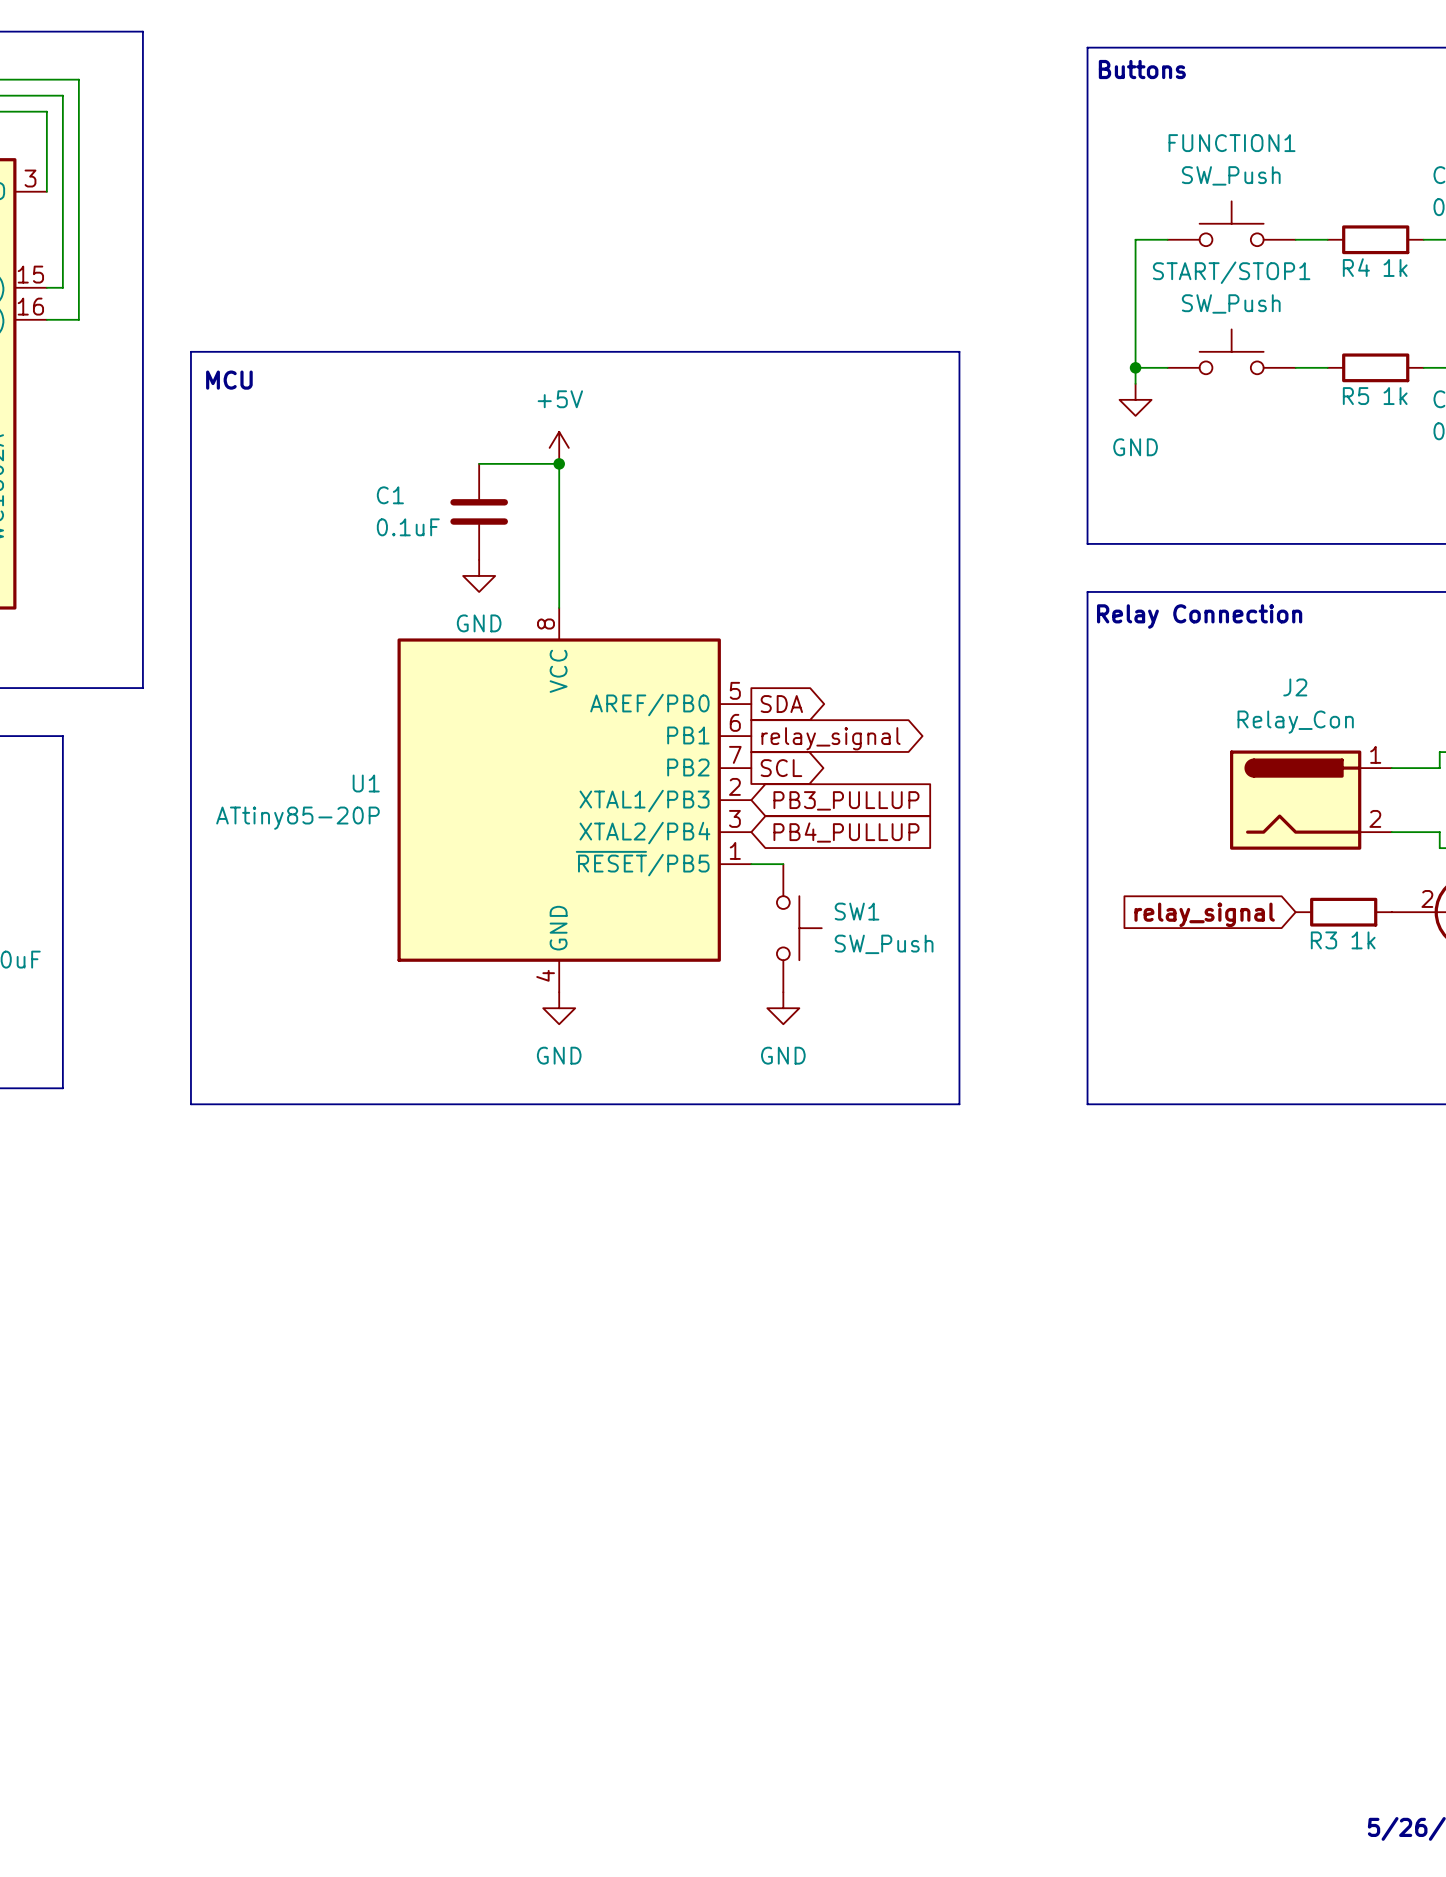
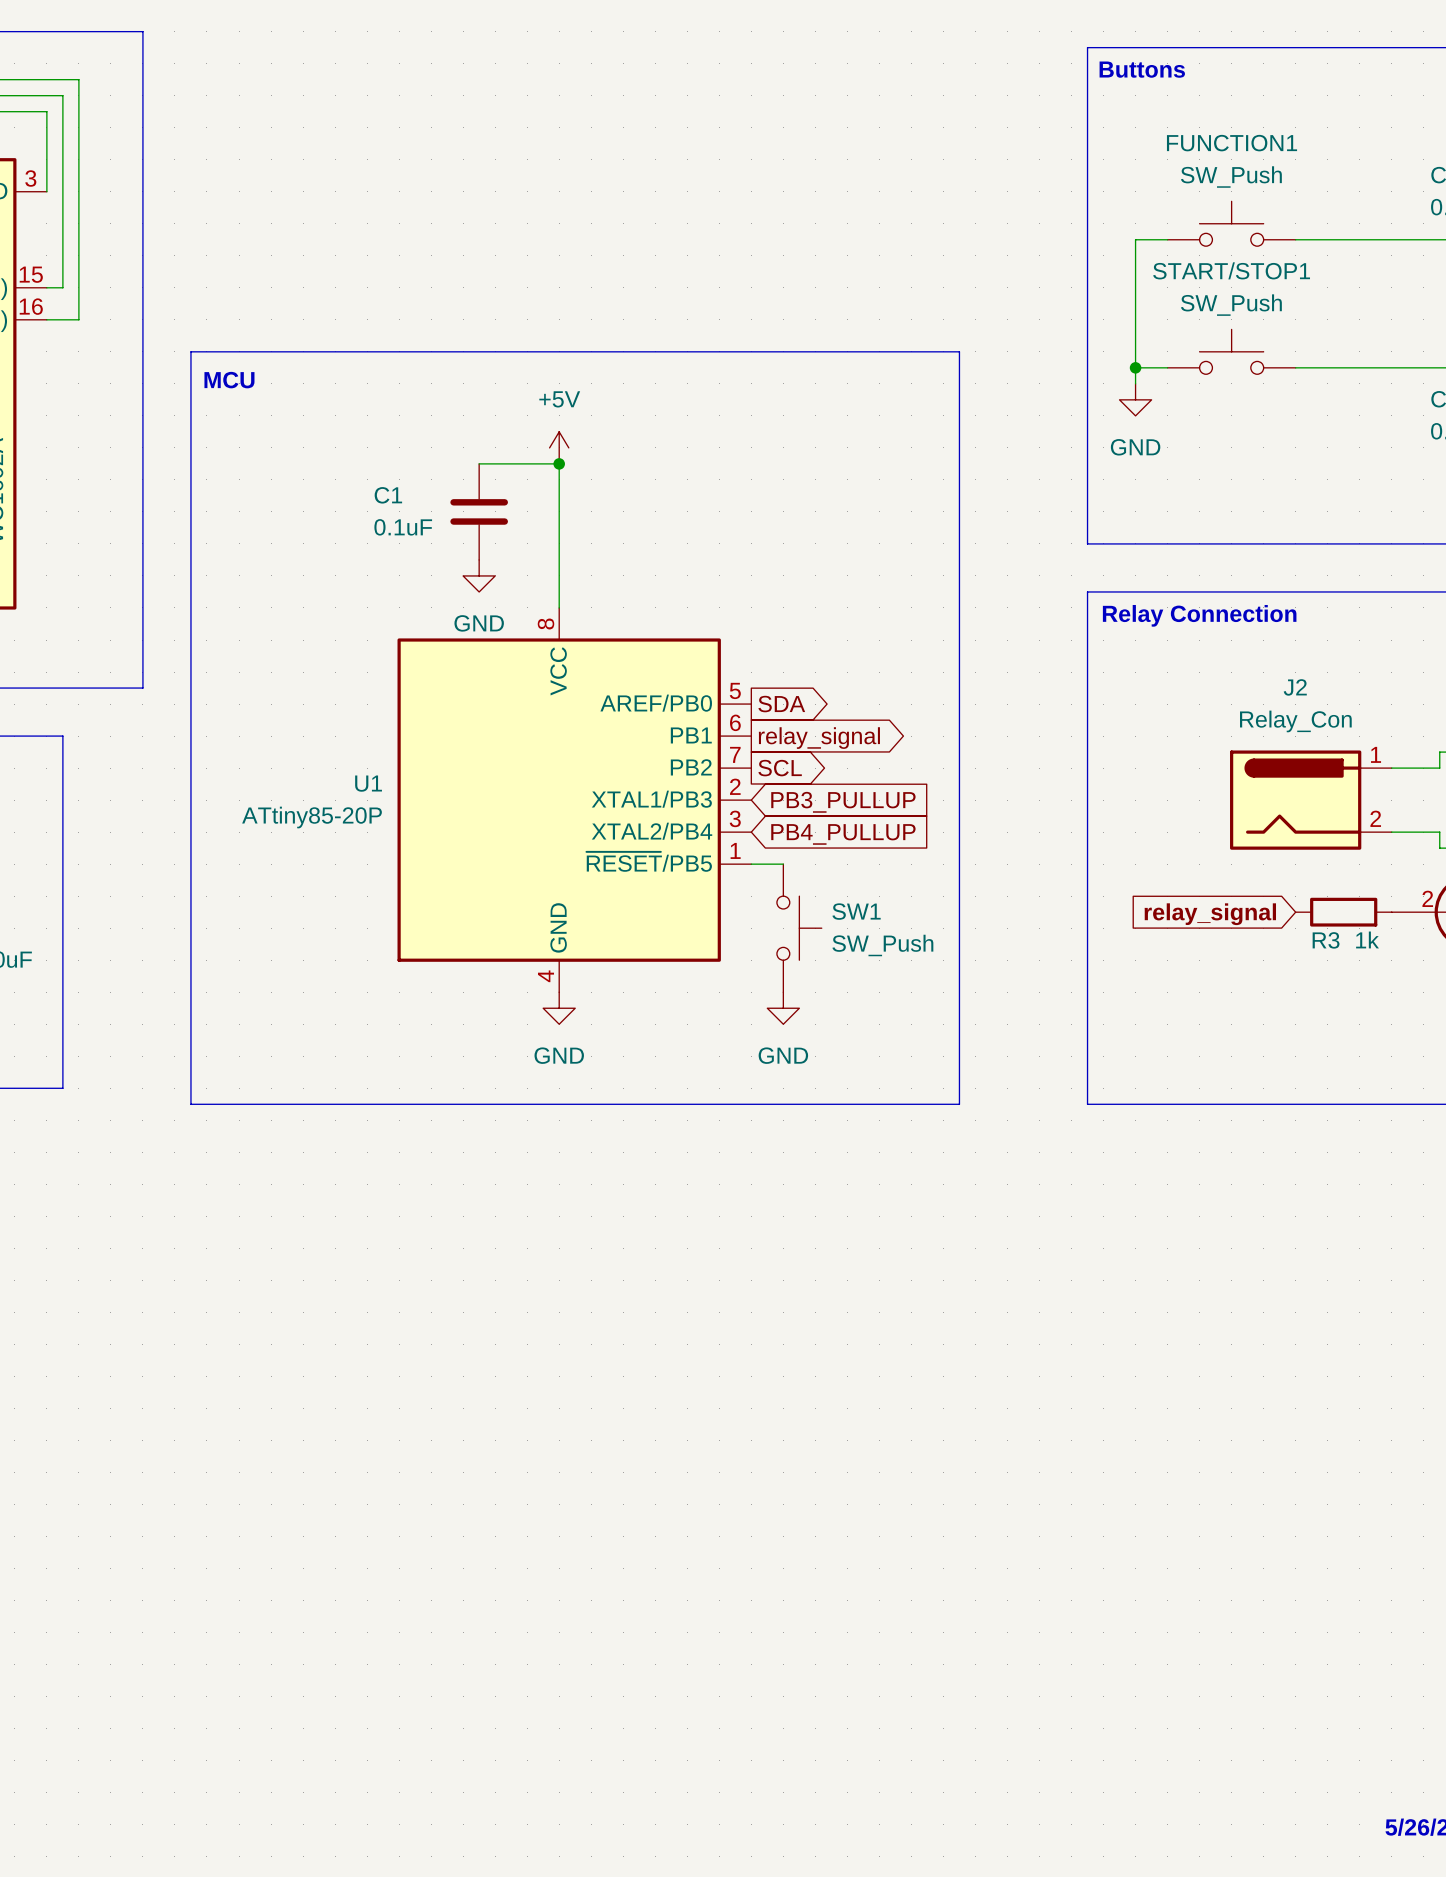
wire: none -> (1327, 239) (1423, 239)
R4: 1k (1375, 239) -> none
wire: none -> (1327, 367) (1423, 367)
R5: 1k (1375, 367) -> none

